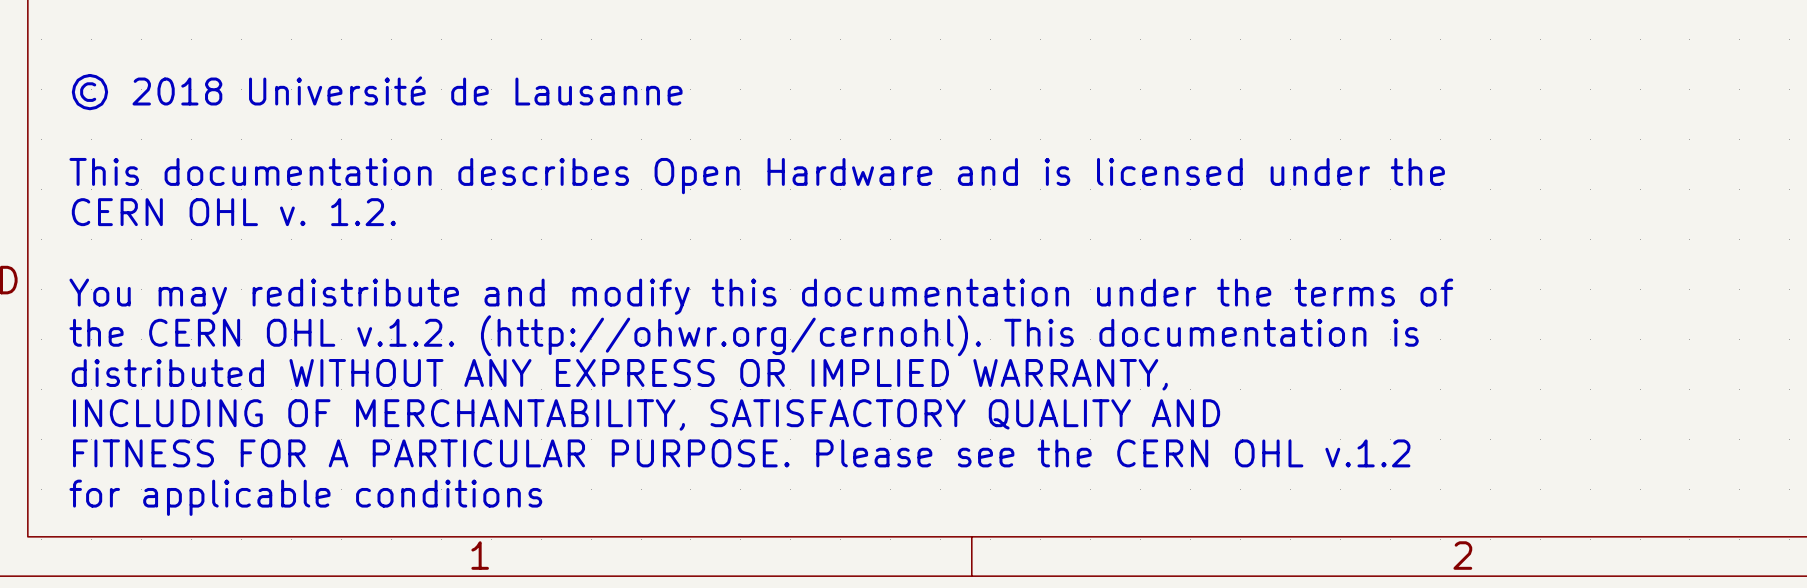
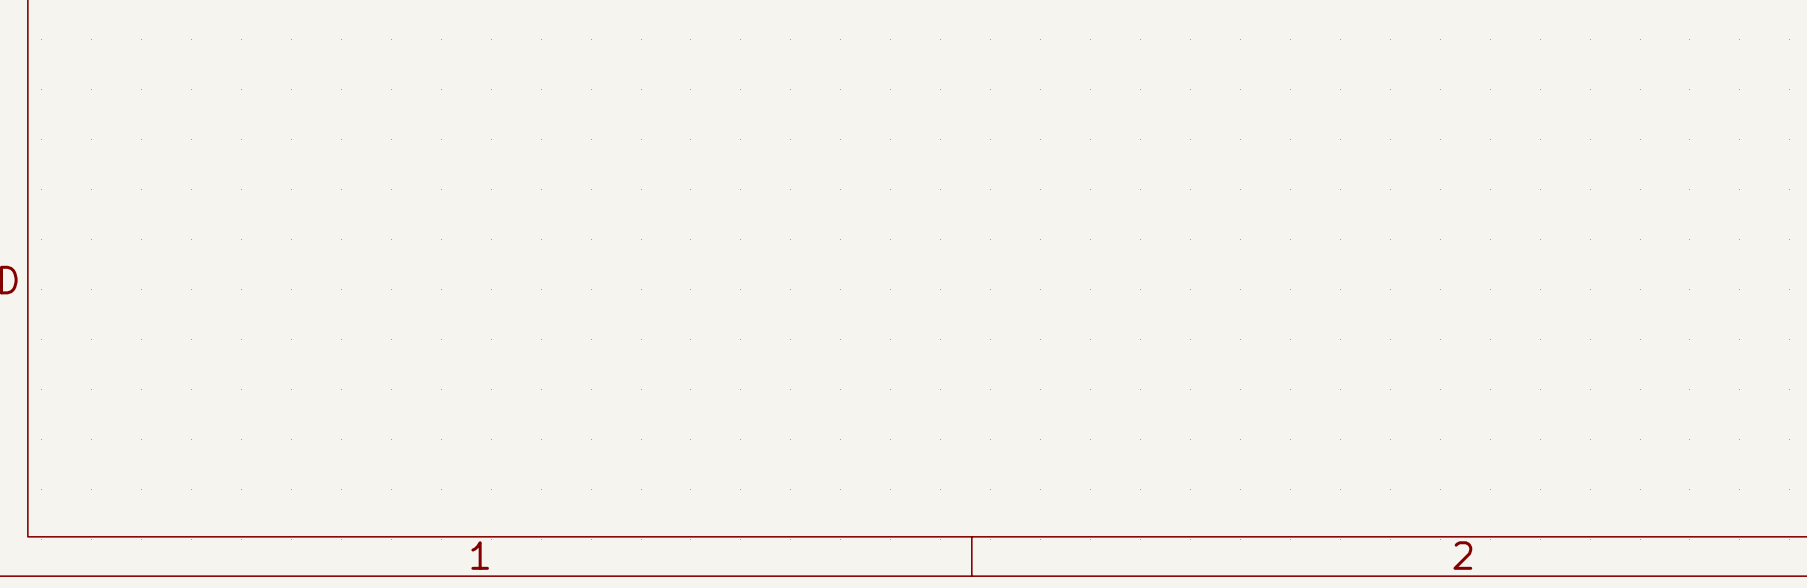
text: © 2018 Université de Lausanne (377, 92) -> none
text: This documentation describes Open Hardware and is licensed under the (757, 176) -> none
text: CERN OHL v. 1.2. (233, 212) -> none
text: You may redistribute and modify this documentation under the terms of (761, 296) -> none
text: the CERN OHL v.1.2. (http://ohwr.org/cernohl). This documentation is (744, 335) -> none
text: distributed WITHOUT ANY EXPRESS OR IMPLIED WARRANTY, (619, 374) -> none
text: INCLUDING OF MERCHANTABILITY, SATISFACTORY QUALITY AND (646, 414) -> none
text: FITNESS FOR A PARTICULAR PURPOSE. Please see the CERN OHL v.1.2 (741, 453) -> none
text: for applicable conditions (305, 497) -> none

